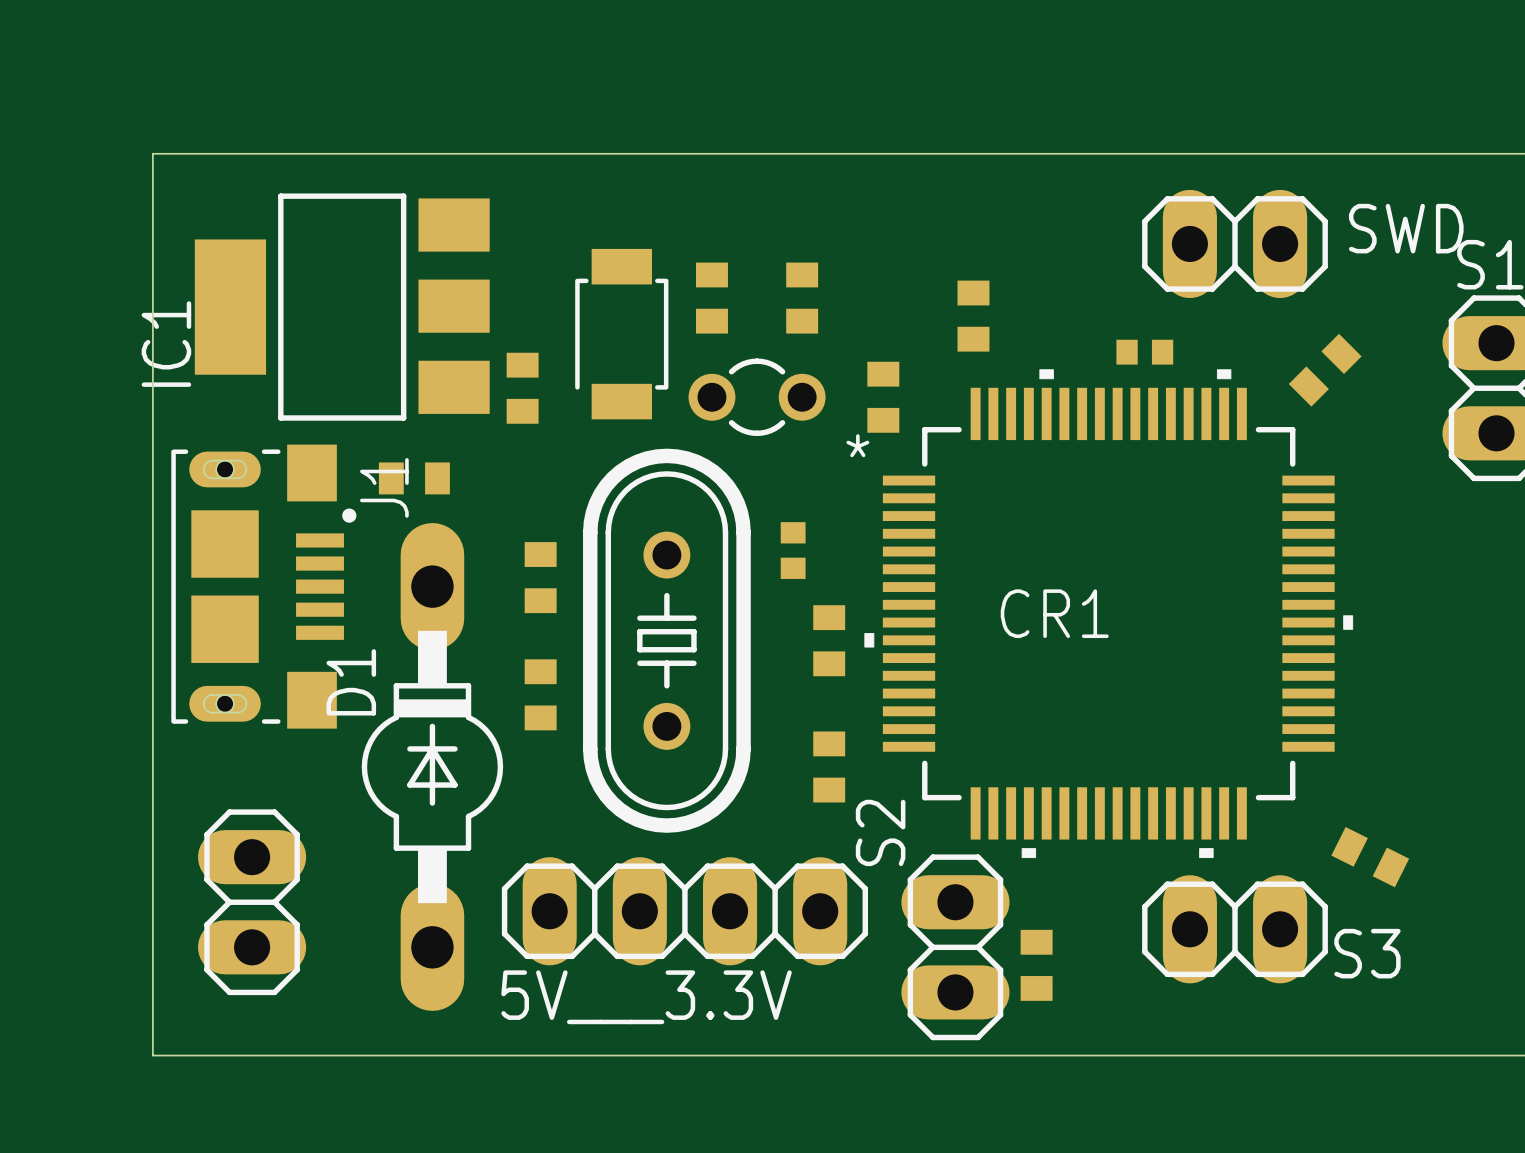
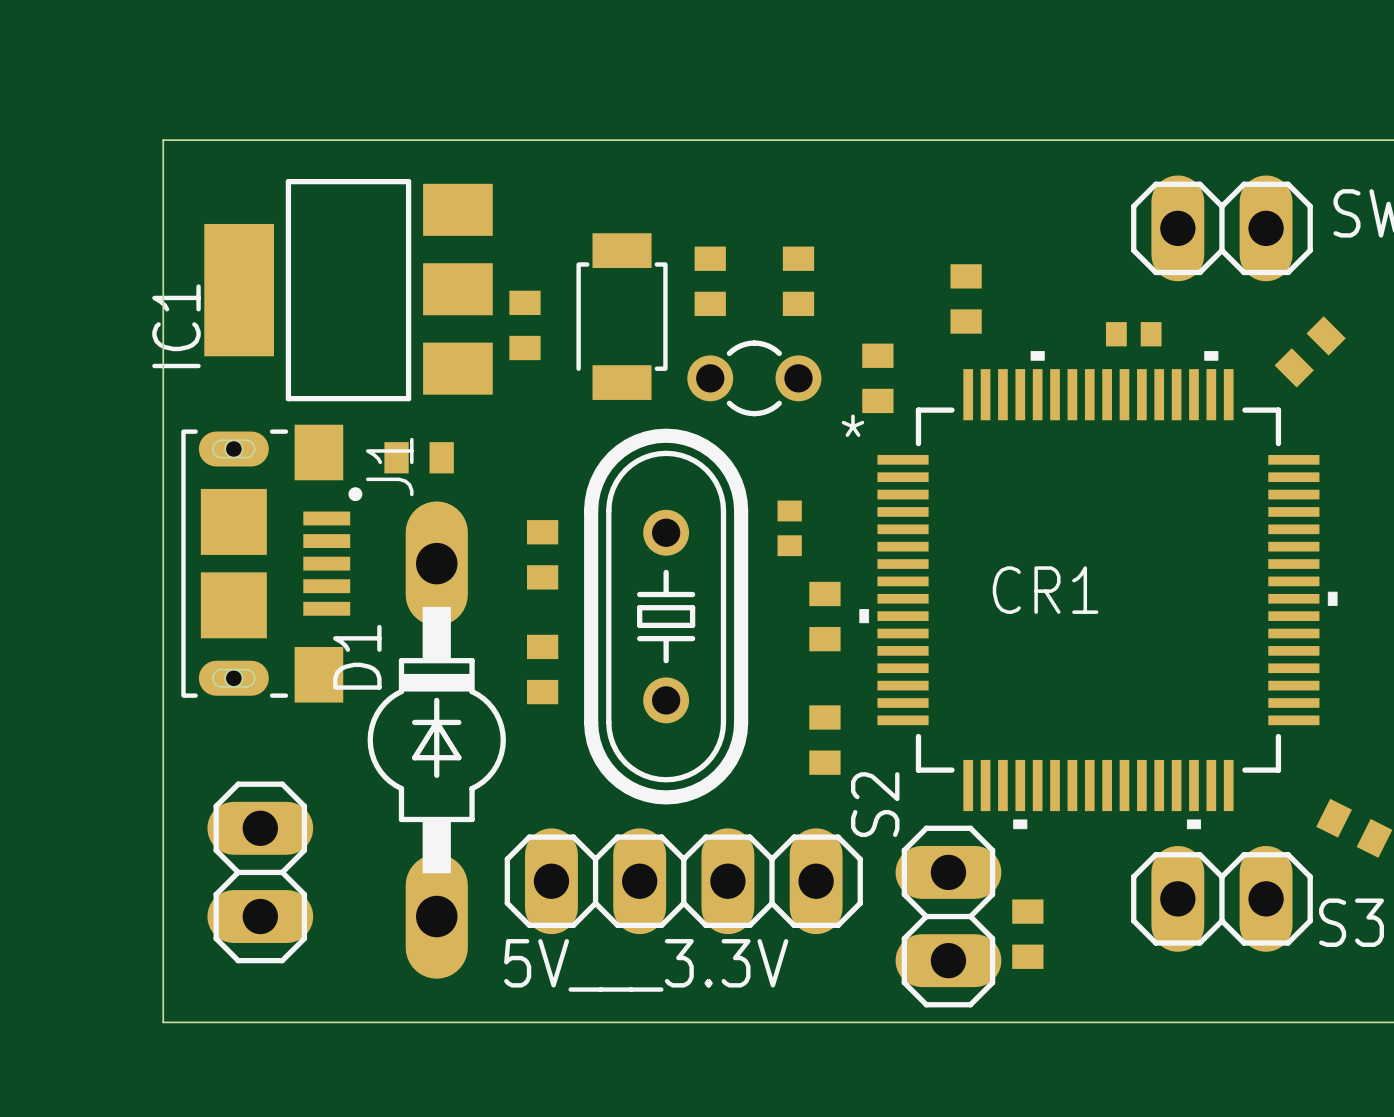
part position: (522, 388) -> (524, 325)

